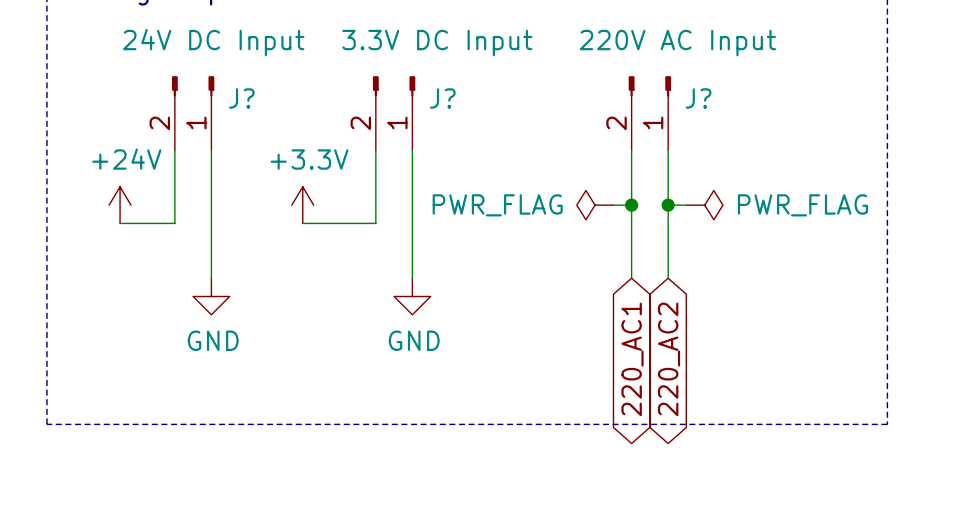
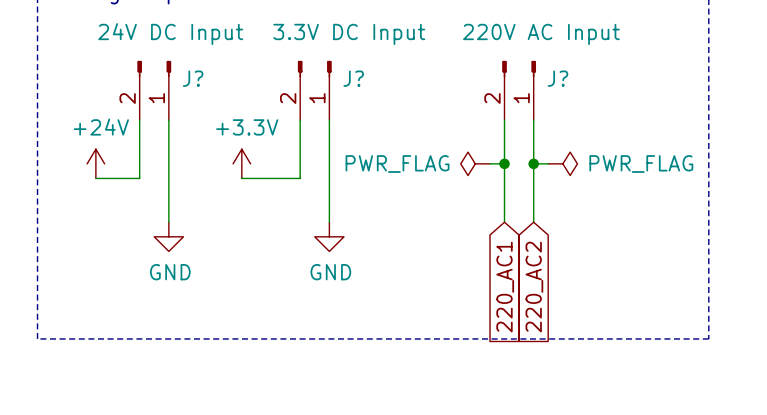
global label shape: bidirectional (632, 359) -> input (505, 287)
global label shape: bidirectional (669, 359) -> input (534, 287)

